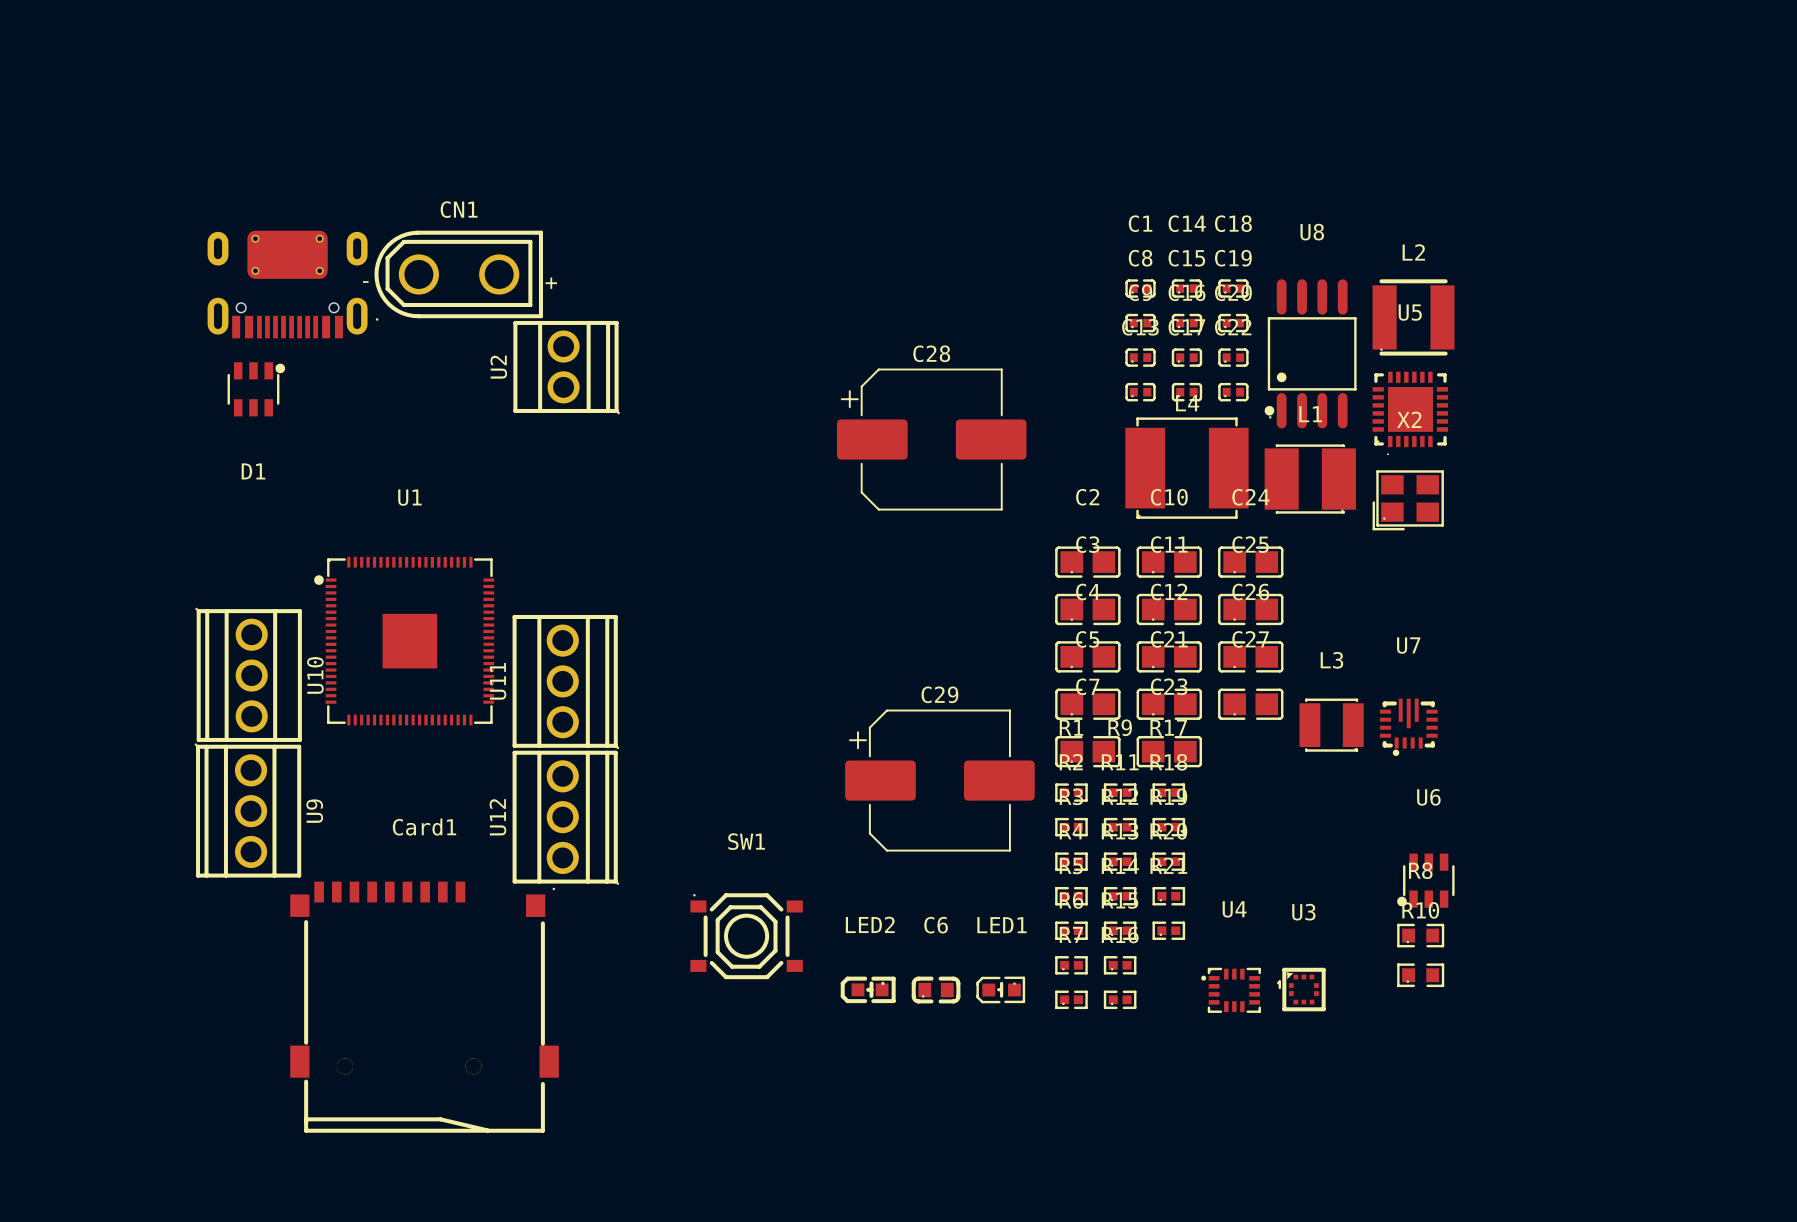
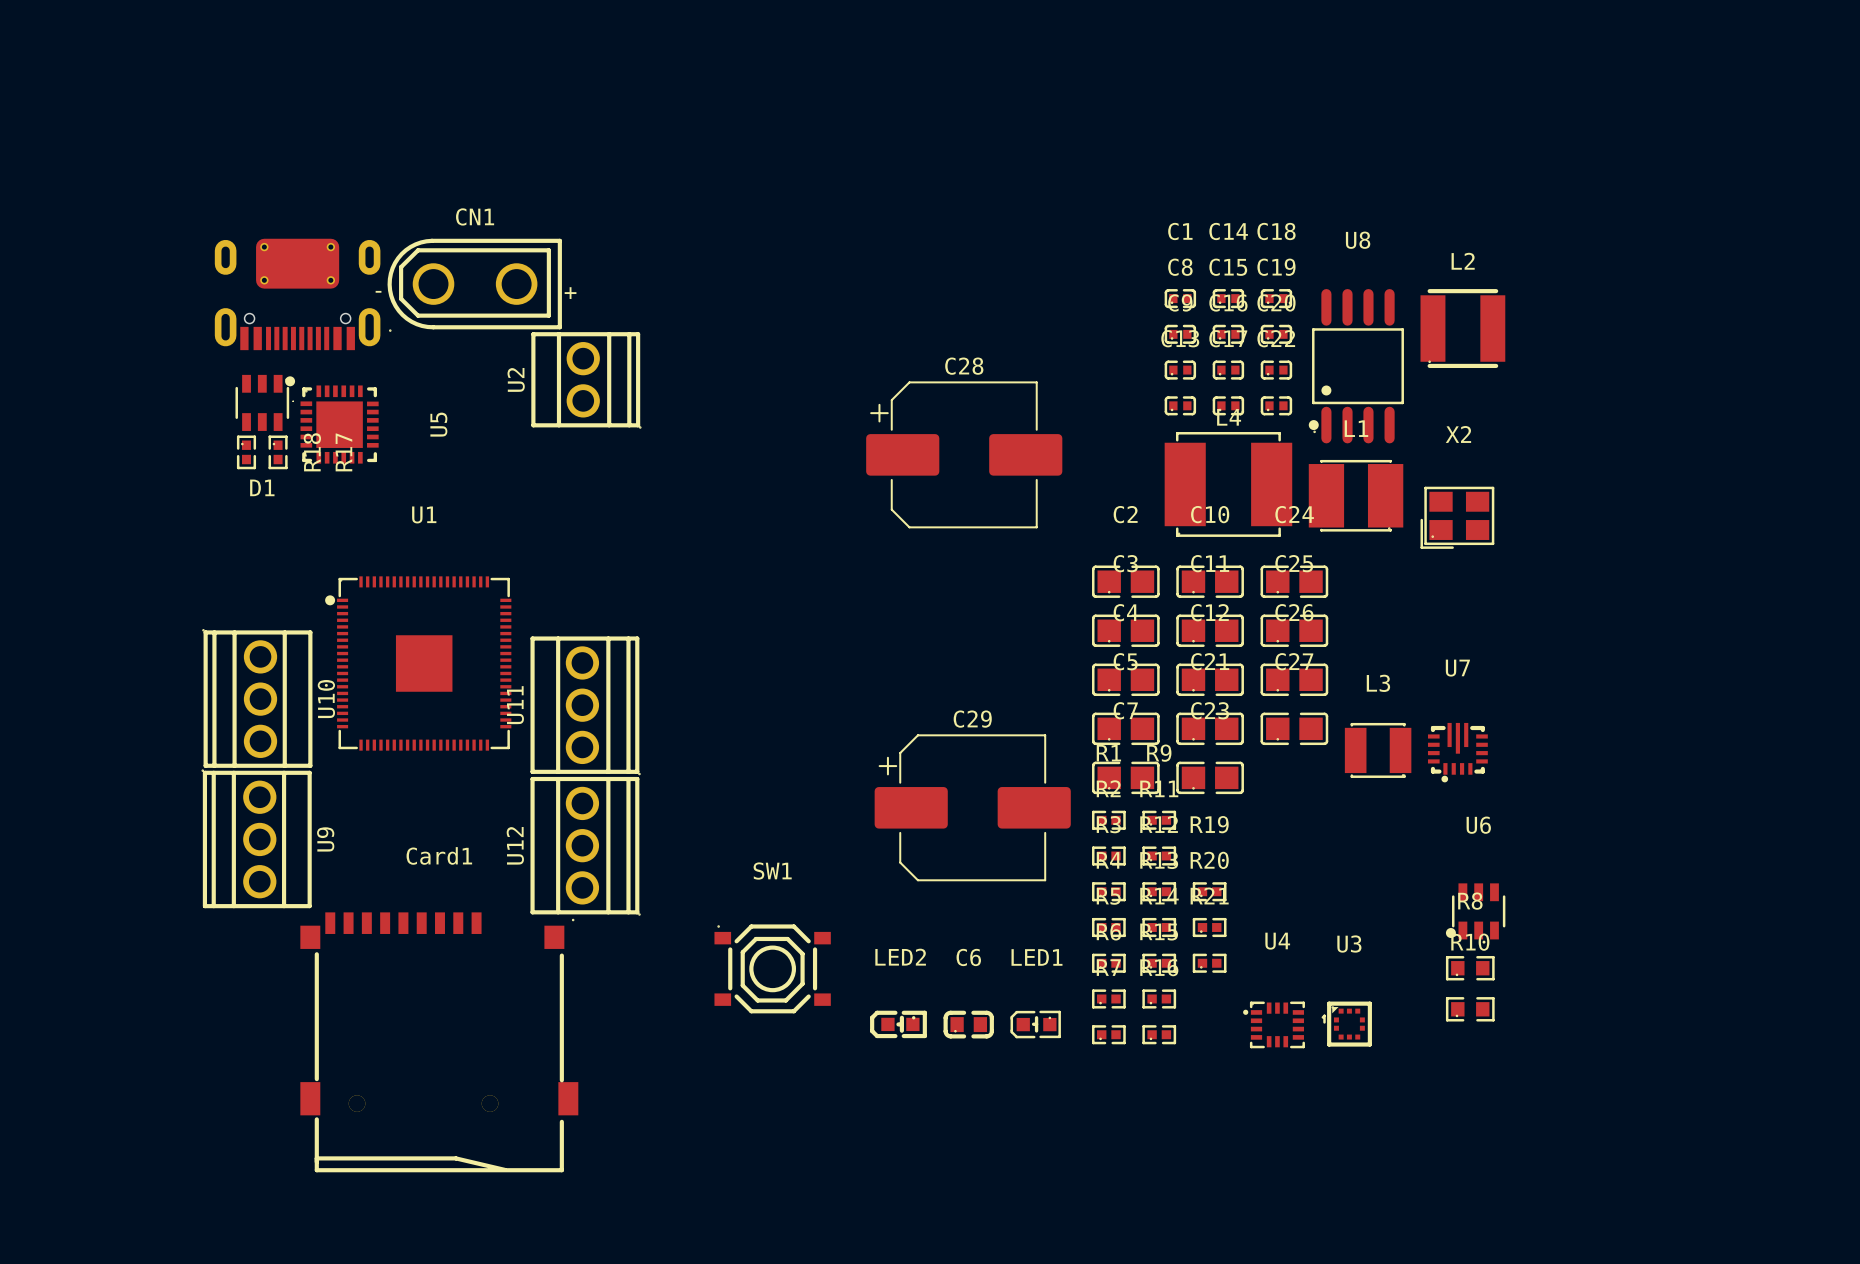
U5 rotation: 0° (1410, 412) -> 90° clockwise (335, 424)
U5 position: (1410, 412) -> (335, 424)
R17 rotation: 0° (1168, 792) -> 90° clockwise (278, 452)
R17 position: (1168, 792) -> (278, 452)
R18 rotation: 0° (1168, 827) -> 90° clockwise (246, 452)
R18 position: (1168, 827) -> (246, 452)

